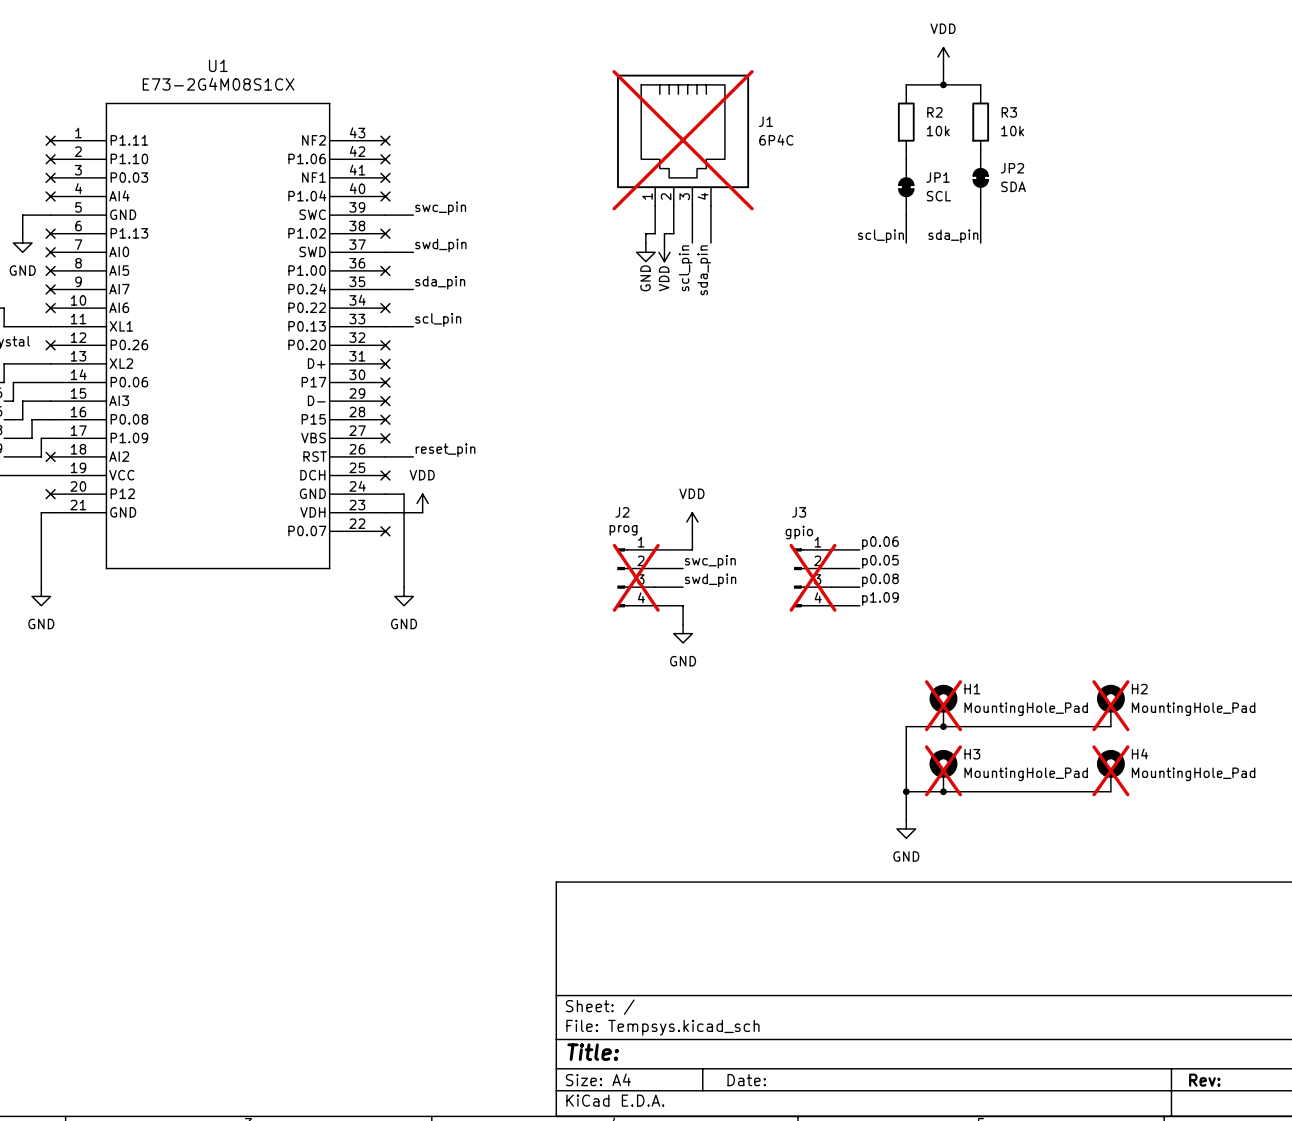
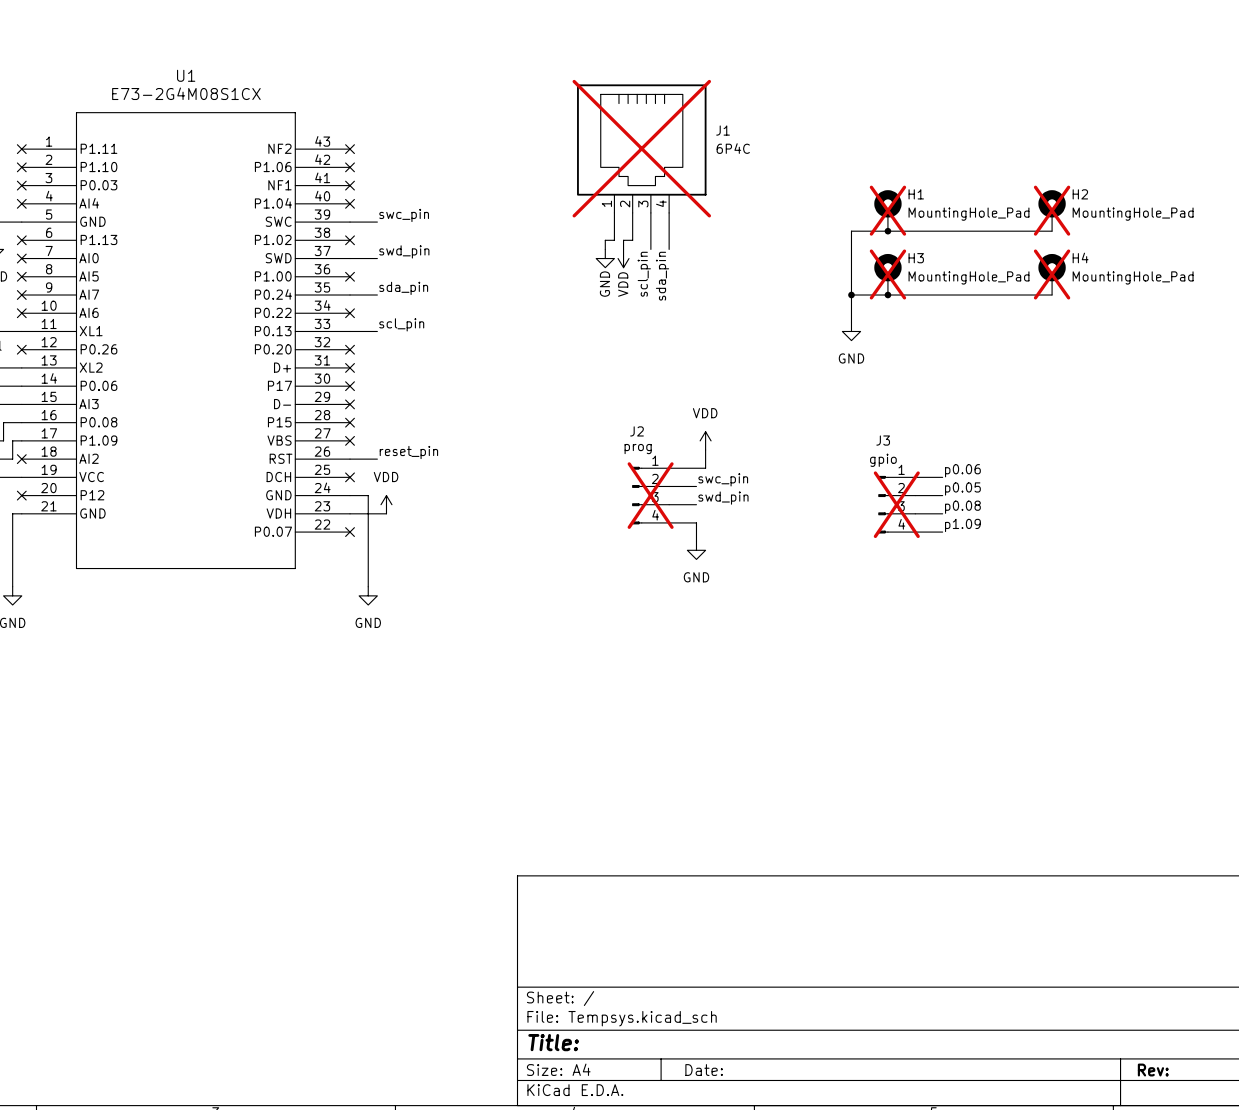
power symbol: VDD (943, 56) -> none
wire: (943, 66) (943, 84) -> none
junction: (943, 84) -> none
wire: (906, 94) (906, 84) (980, 84) (980, 94) -> none
R2: 10k (906, 122) -> none
R3: 10k (980, 122) -> none
wire: (906, 149) (906, 159) -> none
JP2: SDA (980, 177) -> none
JP1: SCL (906, 187) -> none
wire: (980, 205) (980, 243) -> none
wire: (906, 215) (906, 243) -> none
junction: none -> (887, 231)
wire: none -> (1052, 231) (851, 231) (851, 322)
label: scl_pin (880, 236) -> none
label: sda_pin (953, 236) -> none
wire: none -> (851, 295) (1052, 295)
junction: none -> (851, 295)
junction: none -> (887, 295)
power symbol: none -> GND (851, 331)
power symbol position: VDD (692, 522) -> VDD (705, 440)
wire: (692, 531) (692, 549) (655, 549) -> (705, 450) (705, 468) (669, 468)
label position: p0.06 (880, 543) -> p0.06 (962, 470)
wire: (831, 549) (859, 549) -> (915, 477) (942, 477)
label position: swc_pin (710, 561) -> swc_pin (723, 479)
label position: p0.05 (880, 561) -> p0.05 (962, 488)
wire: (655, 568) (683, 568) -> (669, 486) (696, 486)
wire: (831, 568) (859, 568) -> (915, 495) (942, 495)
J2 position: (636, 577) -> (650, 495)
J3 position: (813, 577) -> (896, 504)
label position: swd_pin (710, 580) -> swd_pin (723, 498)
label position: p0.08 (880, 580) -> p0.08 (962, 507)
wire: (655, 587) (683, 587) -> (669, 504) (696, 504)
wire: (831, 587) (859, 587) -> (915, 513) (942, 513)
label position: p1.09 (880, 598) -> p1.09 (962, 525)
wire: (655, 605) (683, 605) (683, 624) -> (669, 522) (696, 522) (696, 541)
wire: (831, 605) (859, 605) -> (915, 532) (942, 532)
power symbol position: GND (683, 633) -> GND (696, 550)
H1 position: (943, 705) -> (887, 210)
H2 position: (1110, 705) -> (1052, 210)
junction: (943, 726) -> none
wire: (1110, 726) (906, 726) (906, 819) -> none
H3 position: (943, 770) -> (887, 274)
H4 position: (1110, 770) -> (1052, 274)
wire: (906, 791) (1110, 791) -> none
junction: (906, 791) -> none
junction: (943, 791) -> none
power symbol: GND (906, 828) -> none

